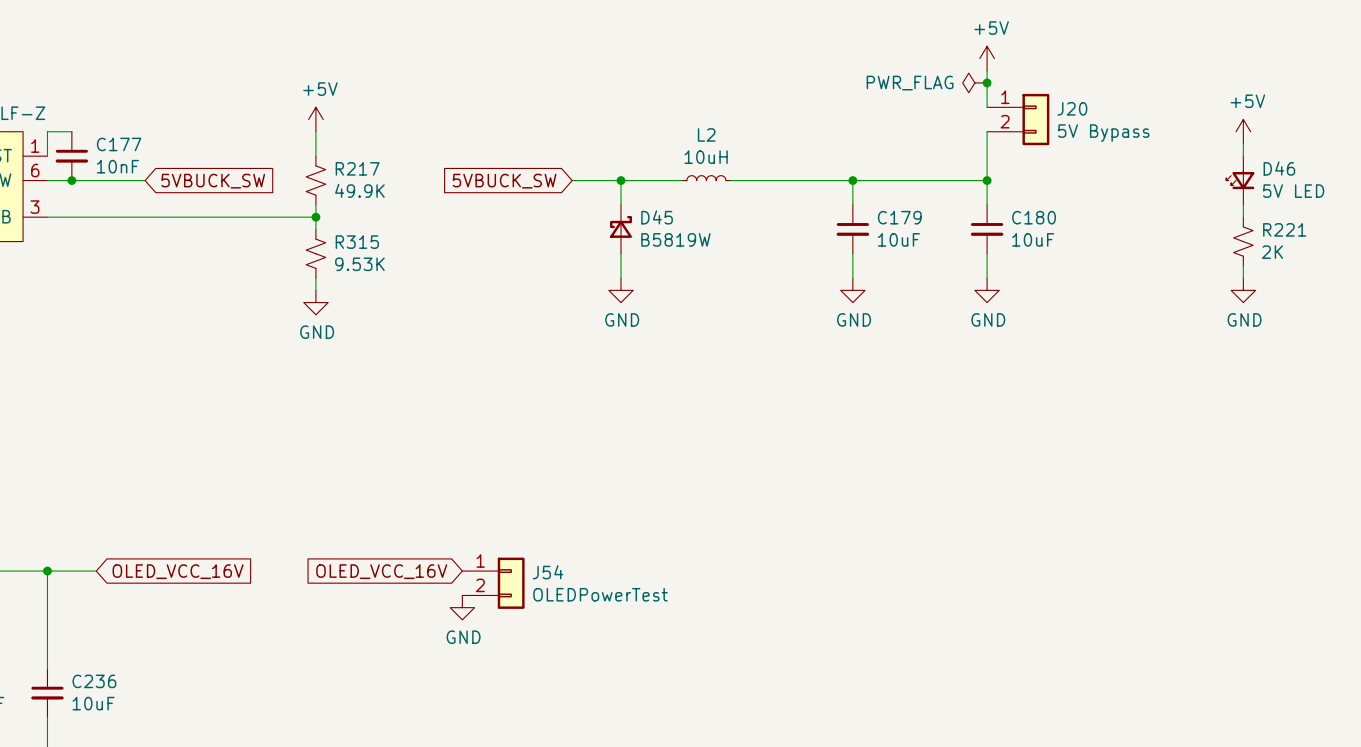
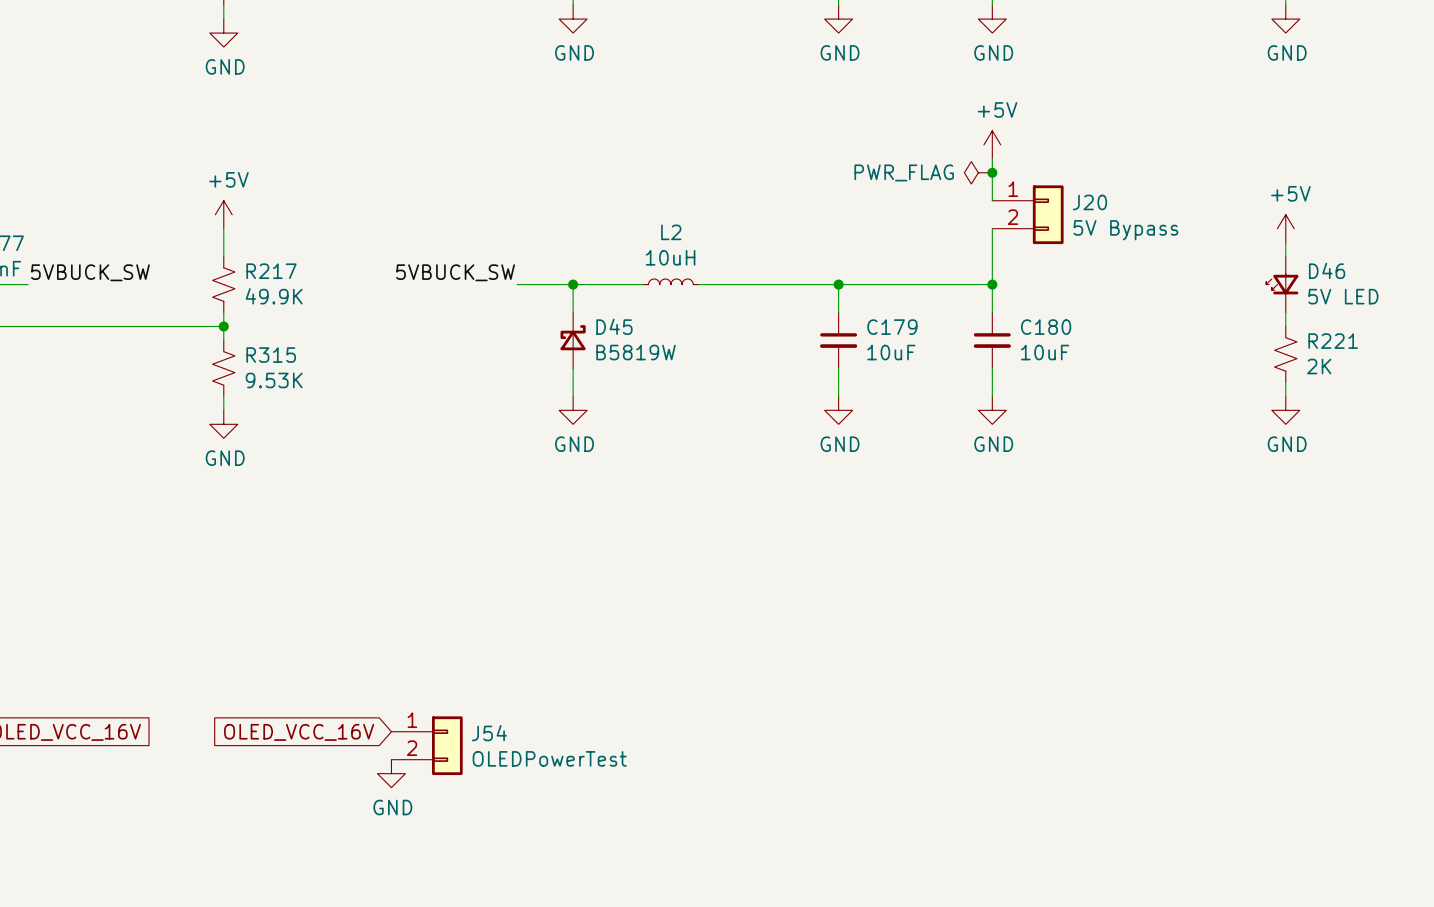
label: none -> 5VBUCK_SW (90, 272)
label: none -> 5VBUCK_SW (455, 272)
global label: 5VBUCK_SW (213, 181) -> none
global label: 5VBUCK_SW (504, 181) -> none

